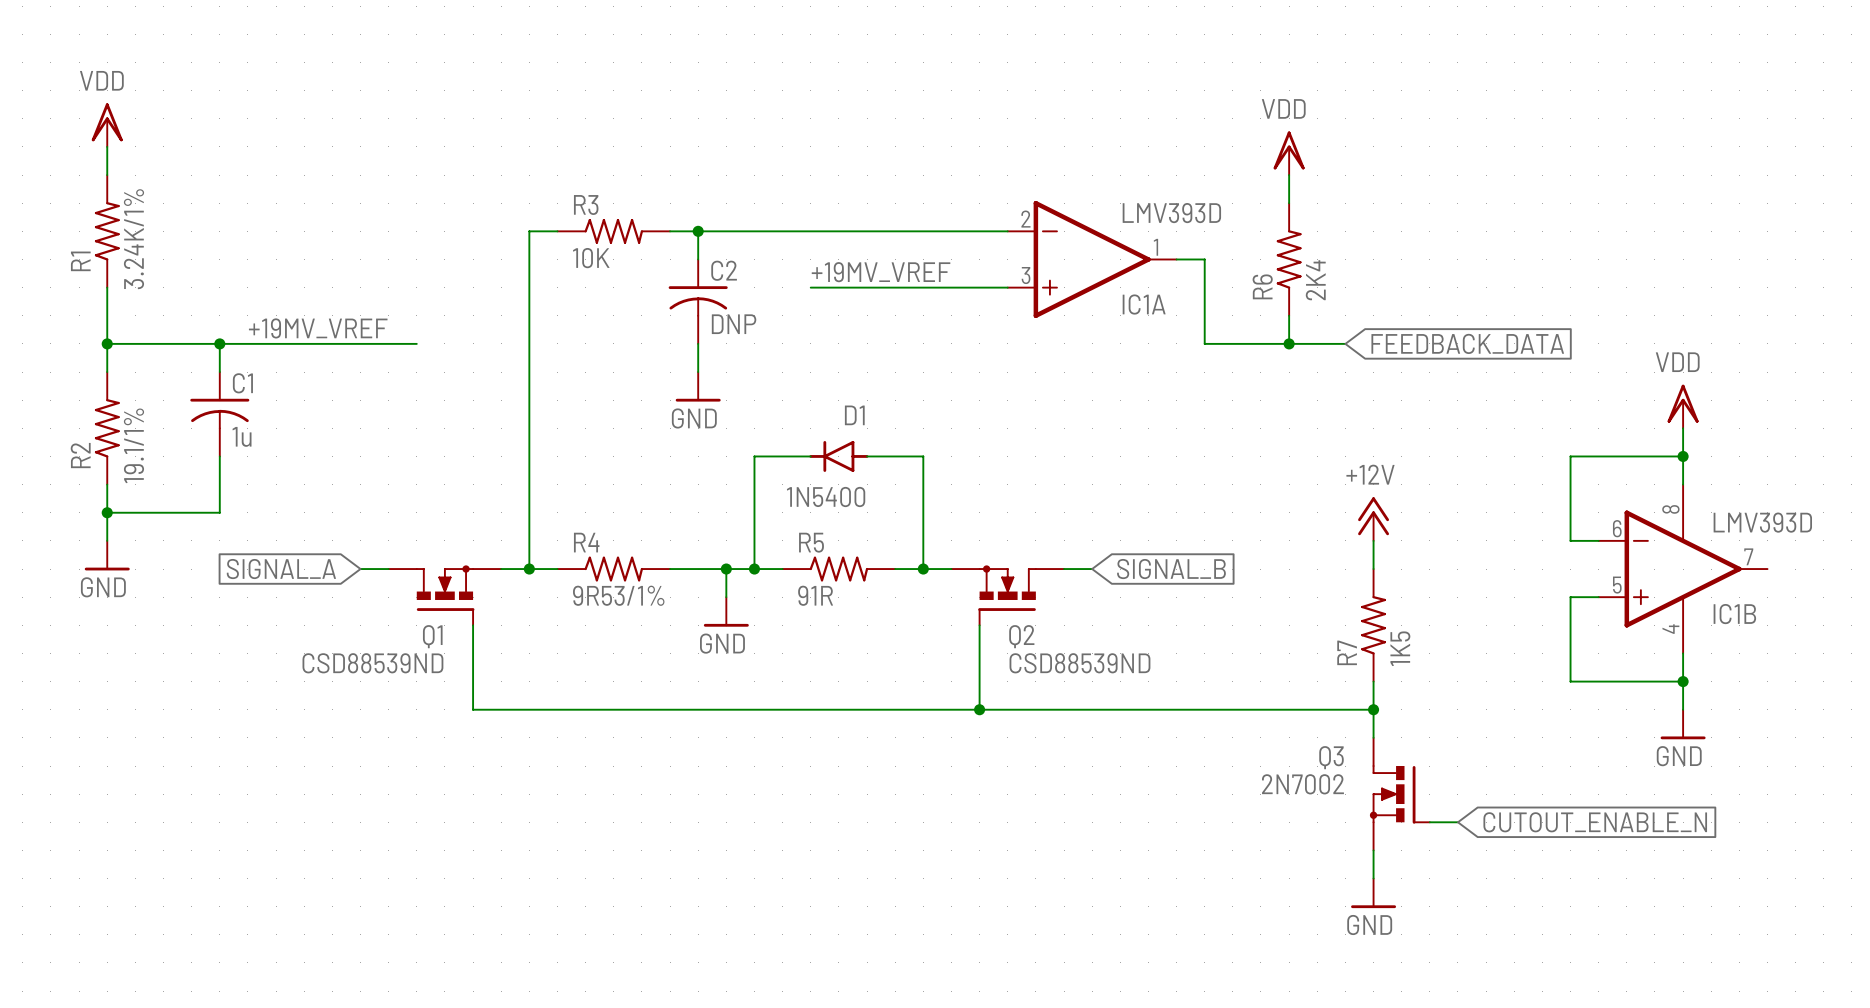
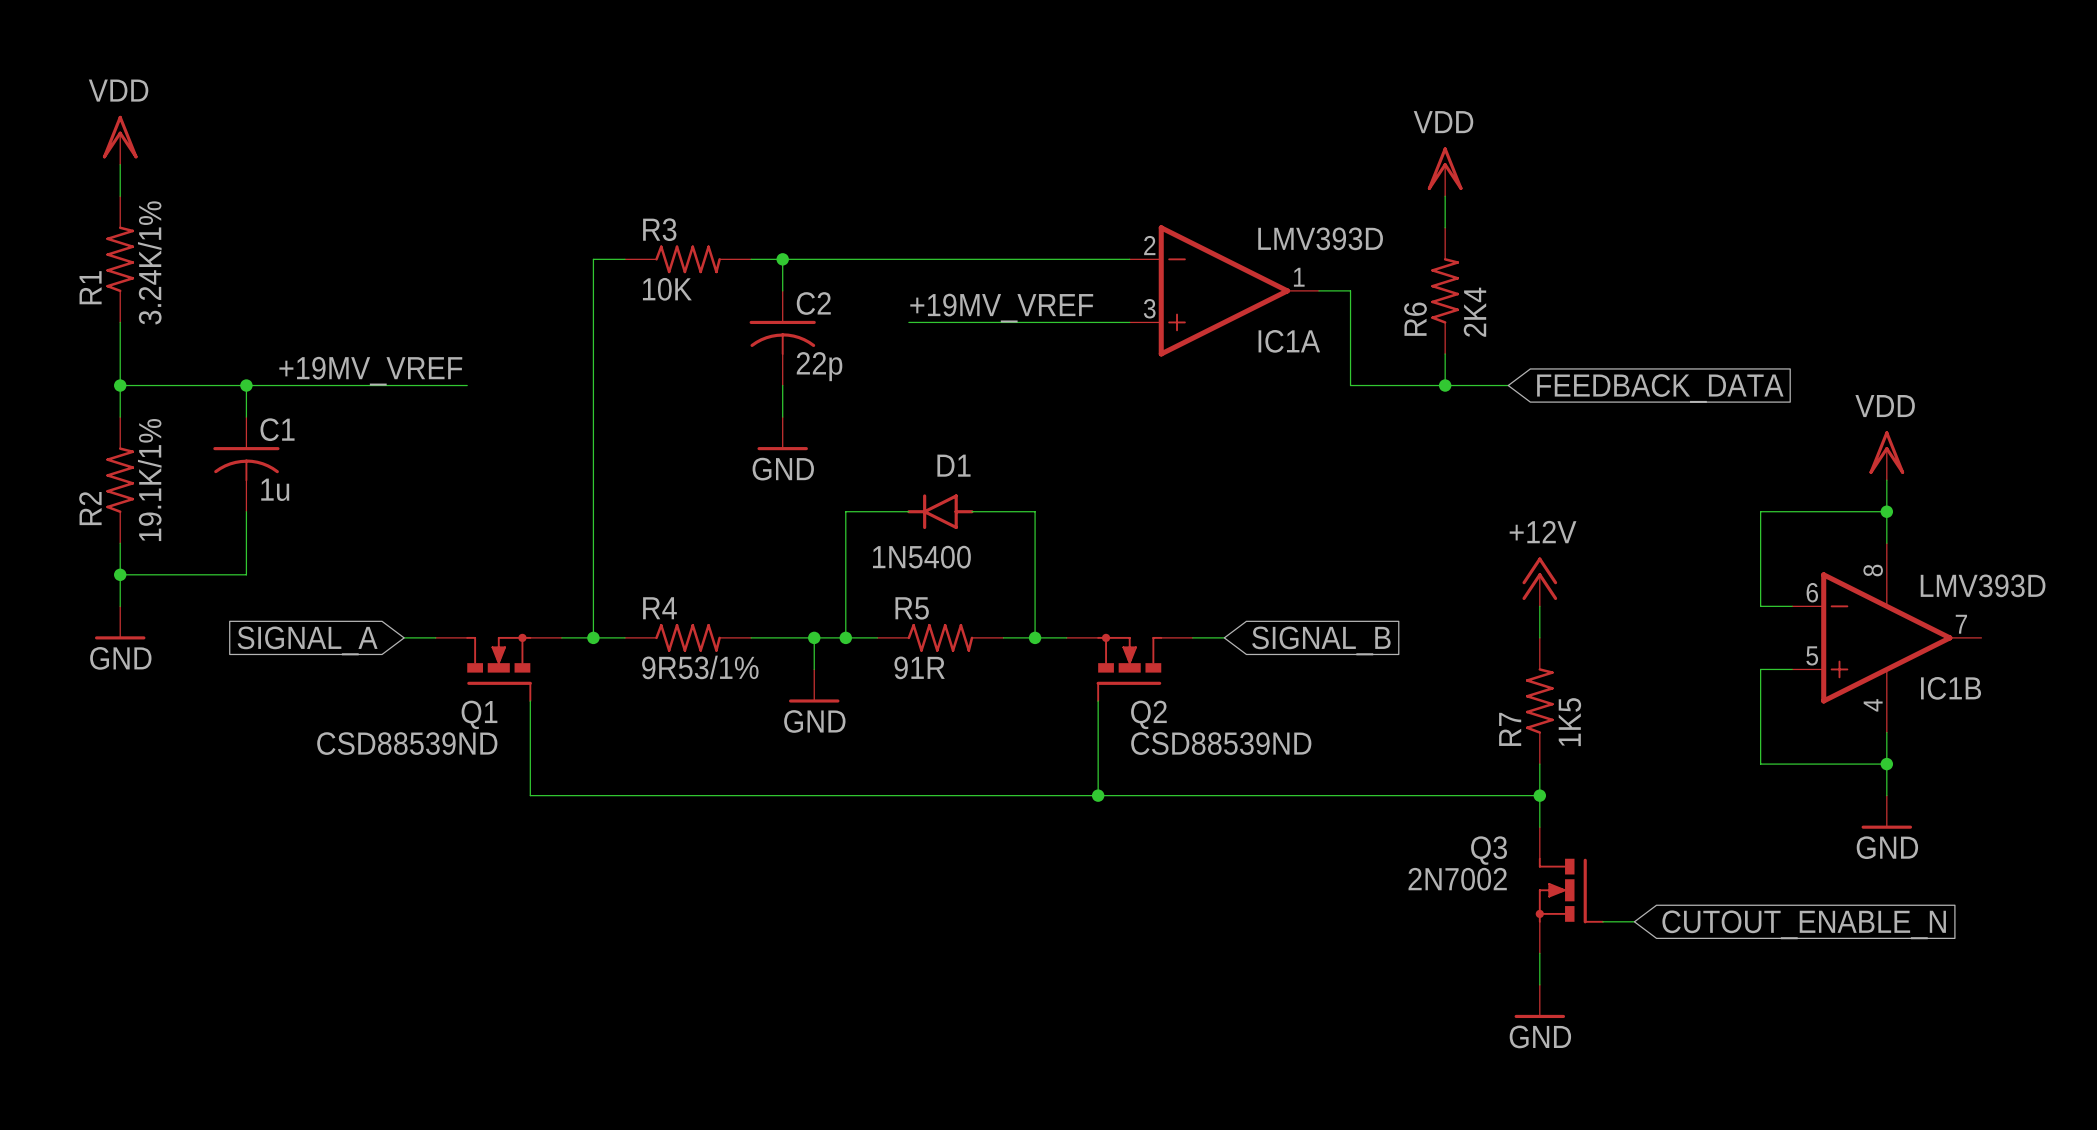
C2 value: DNP (734, 324) -> 22p (819, 366)
R2 value: 19.1/1% (133, 445) -> 19.1K/1% (149, 480)

